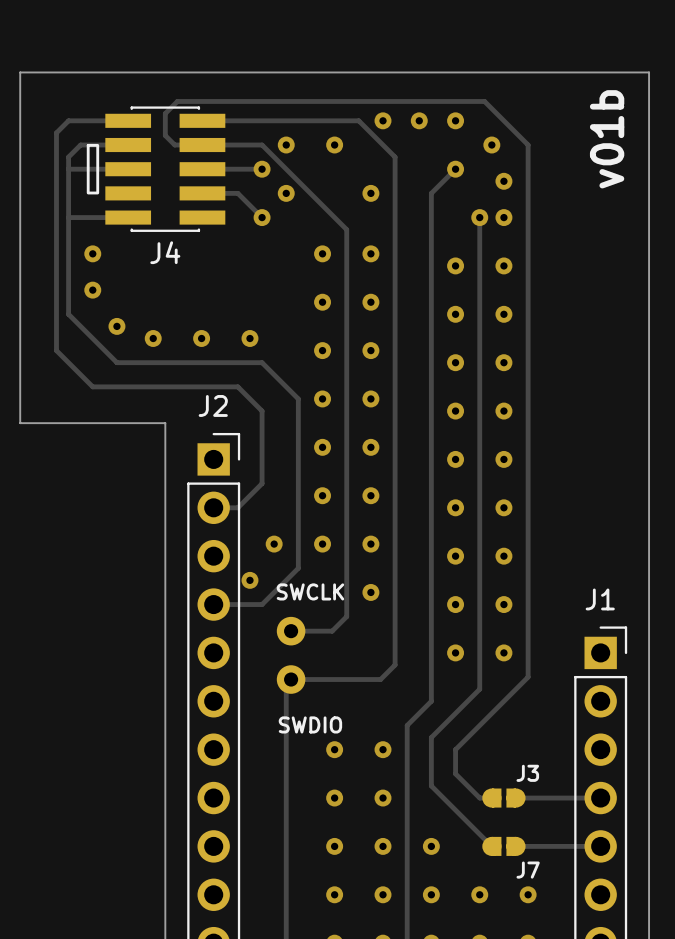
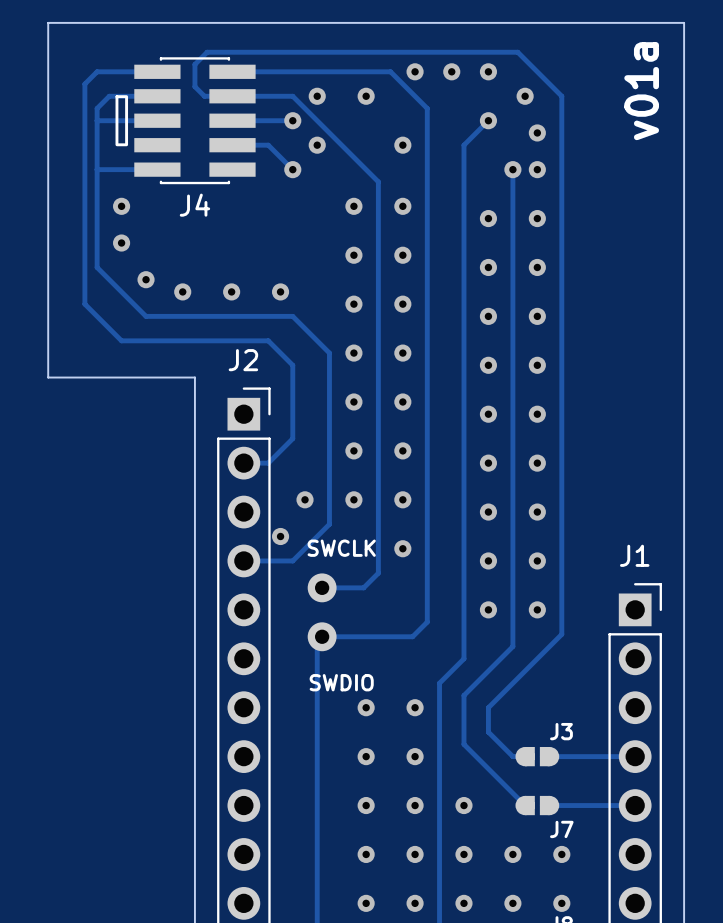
text: v01b (607, 139) -> none
text: none -> v01a (641, 91)

